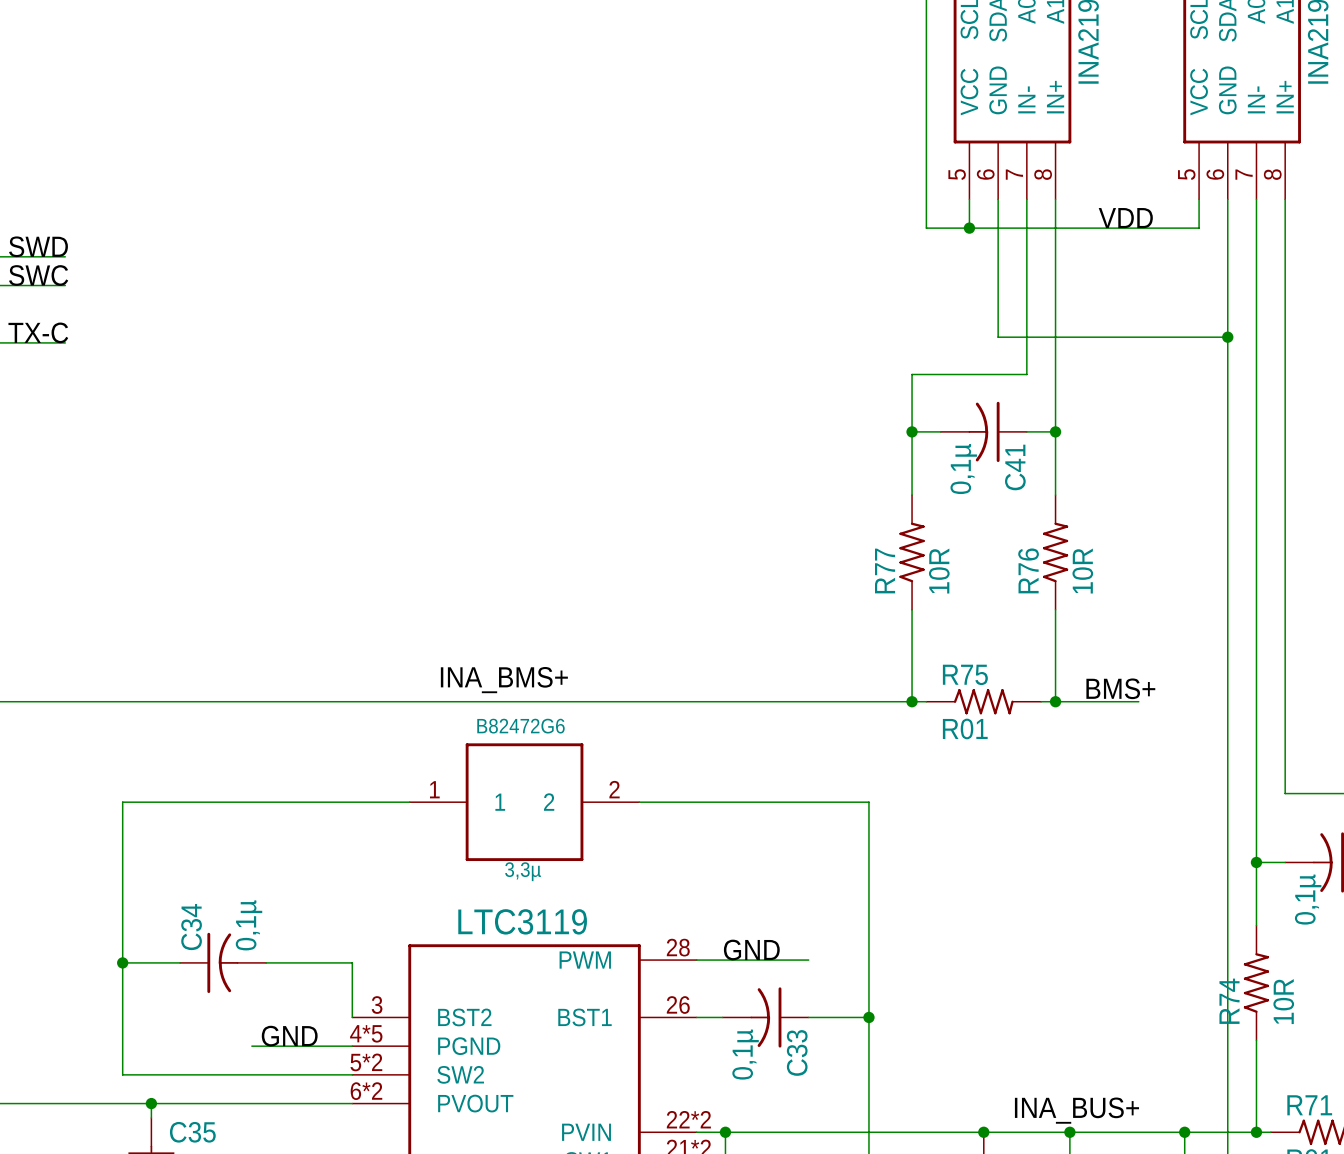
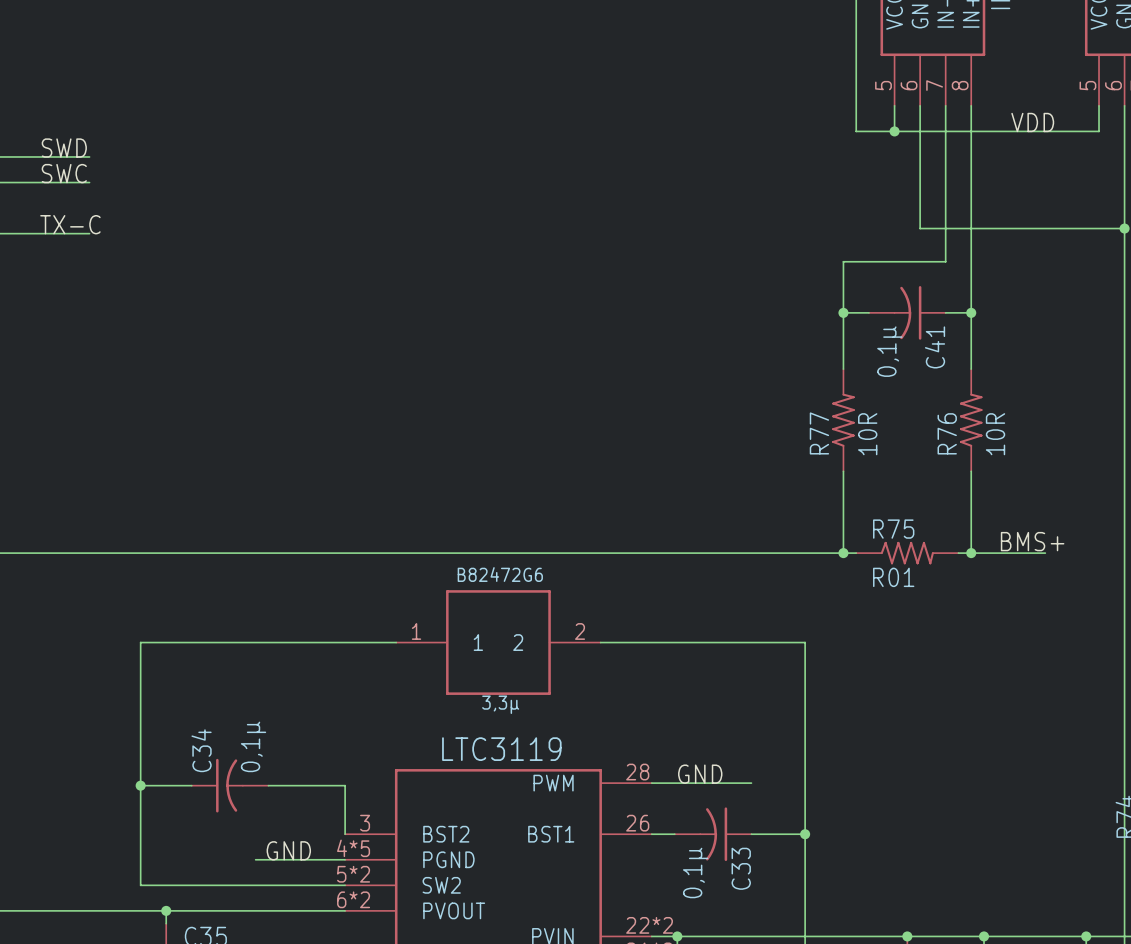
label: INA_BMS+ (504, 680) -> none
label: INA_BUS+ (1076, 1110) -> none

